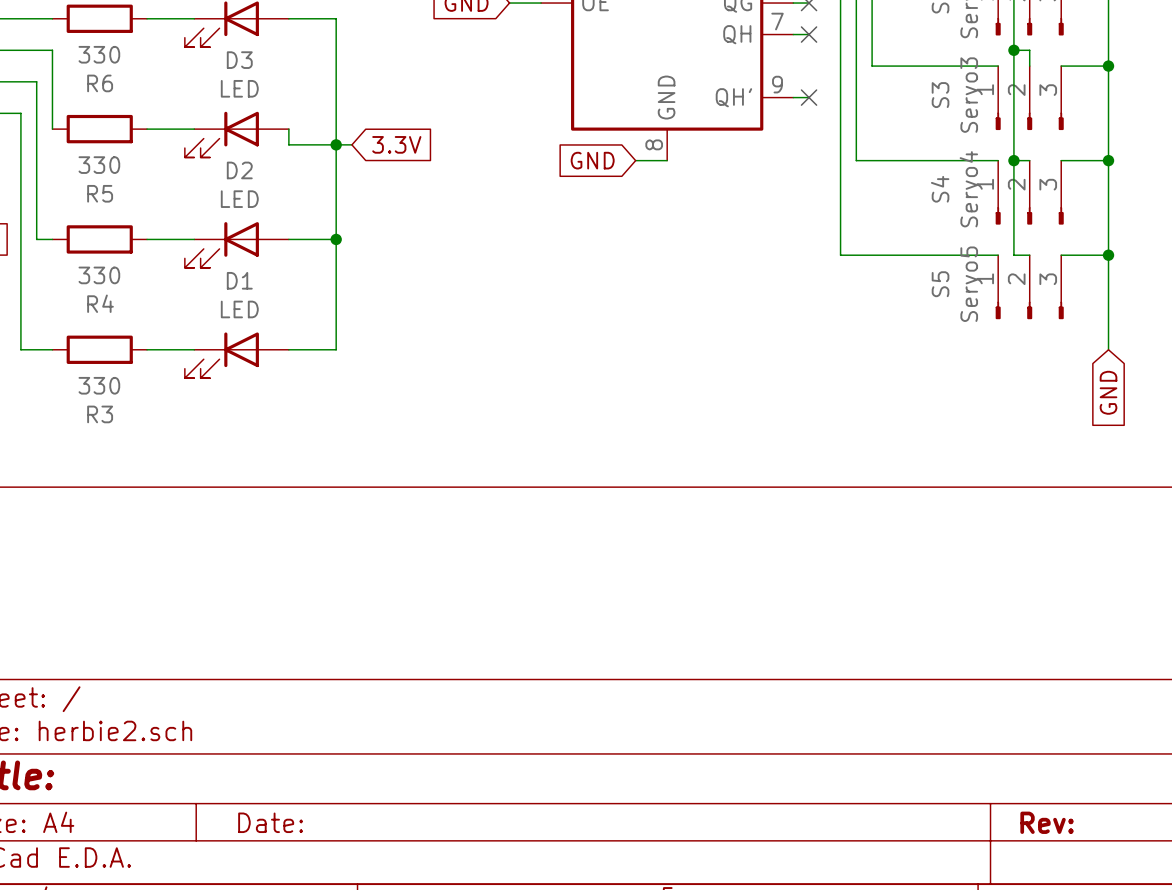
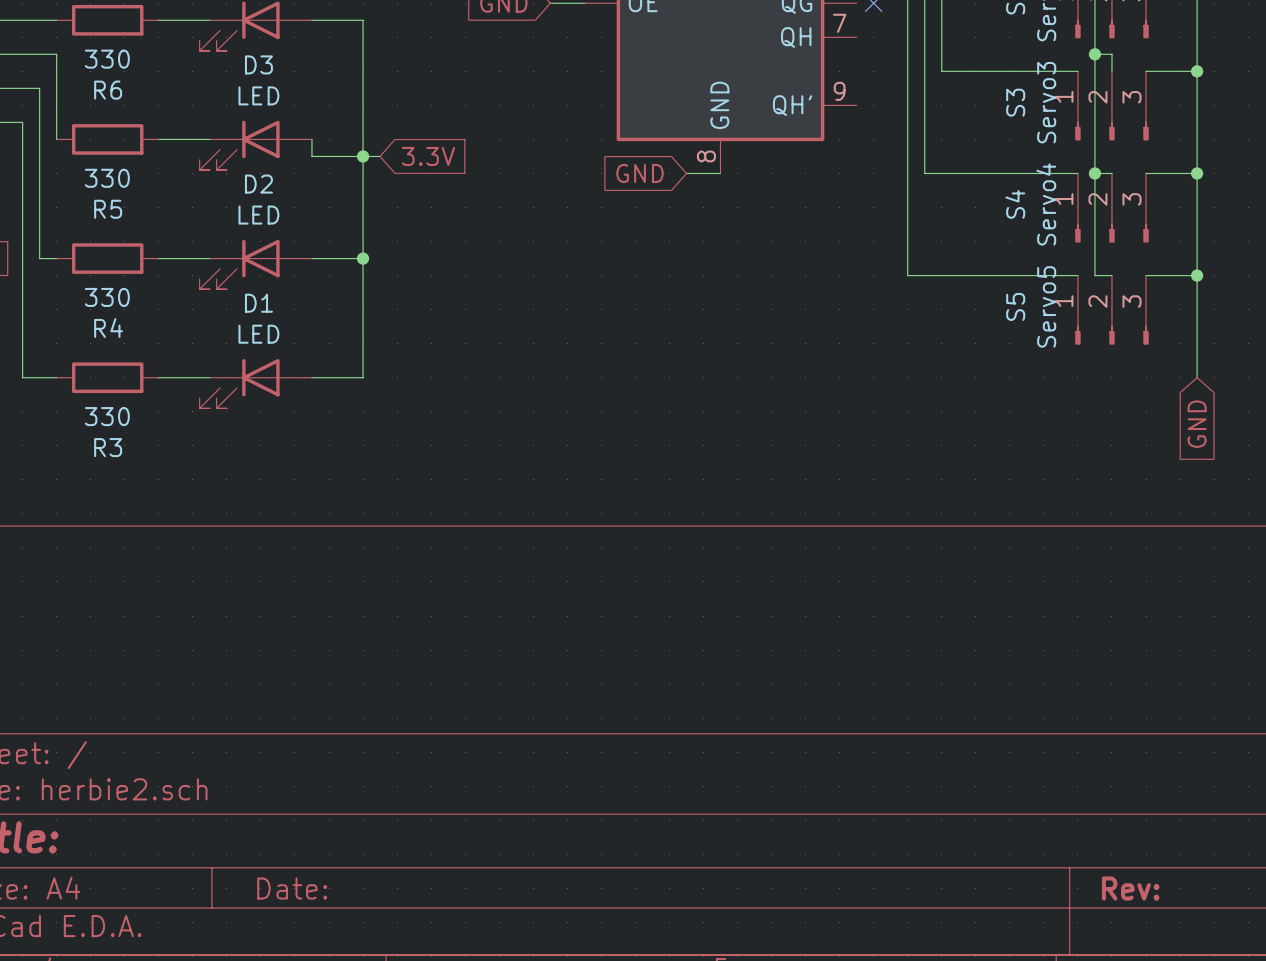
wire: (793, 3) (809, 3) -> none
wire: (793, 34) (809, 34) -> none
no-connect mark: (809, 34) -> none
wire: (793, 97) (809, 97) -> none
no-connect mark: (809, 97) -> none

